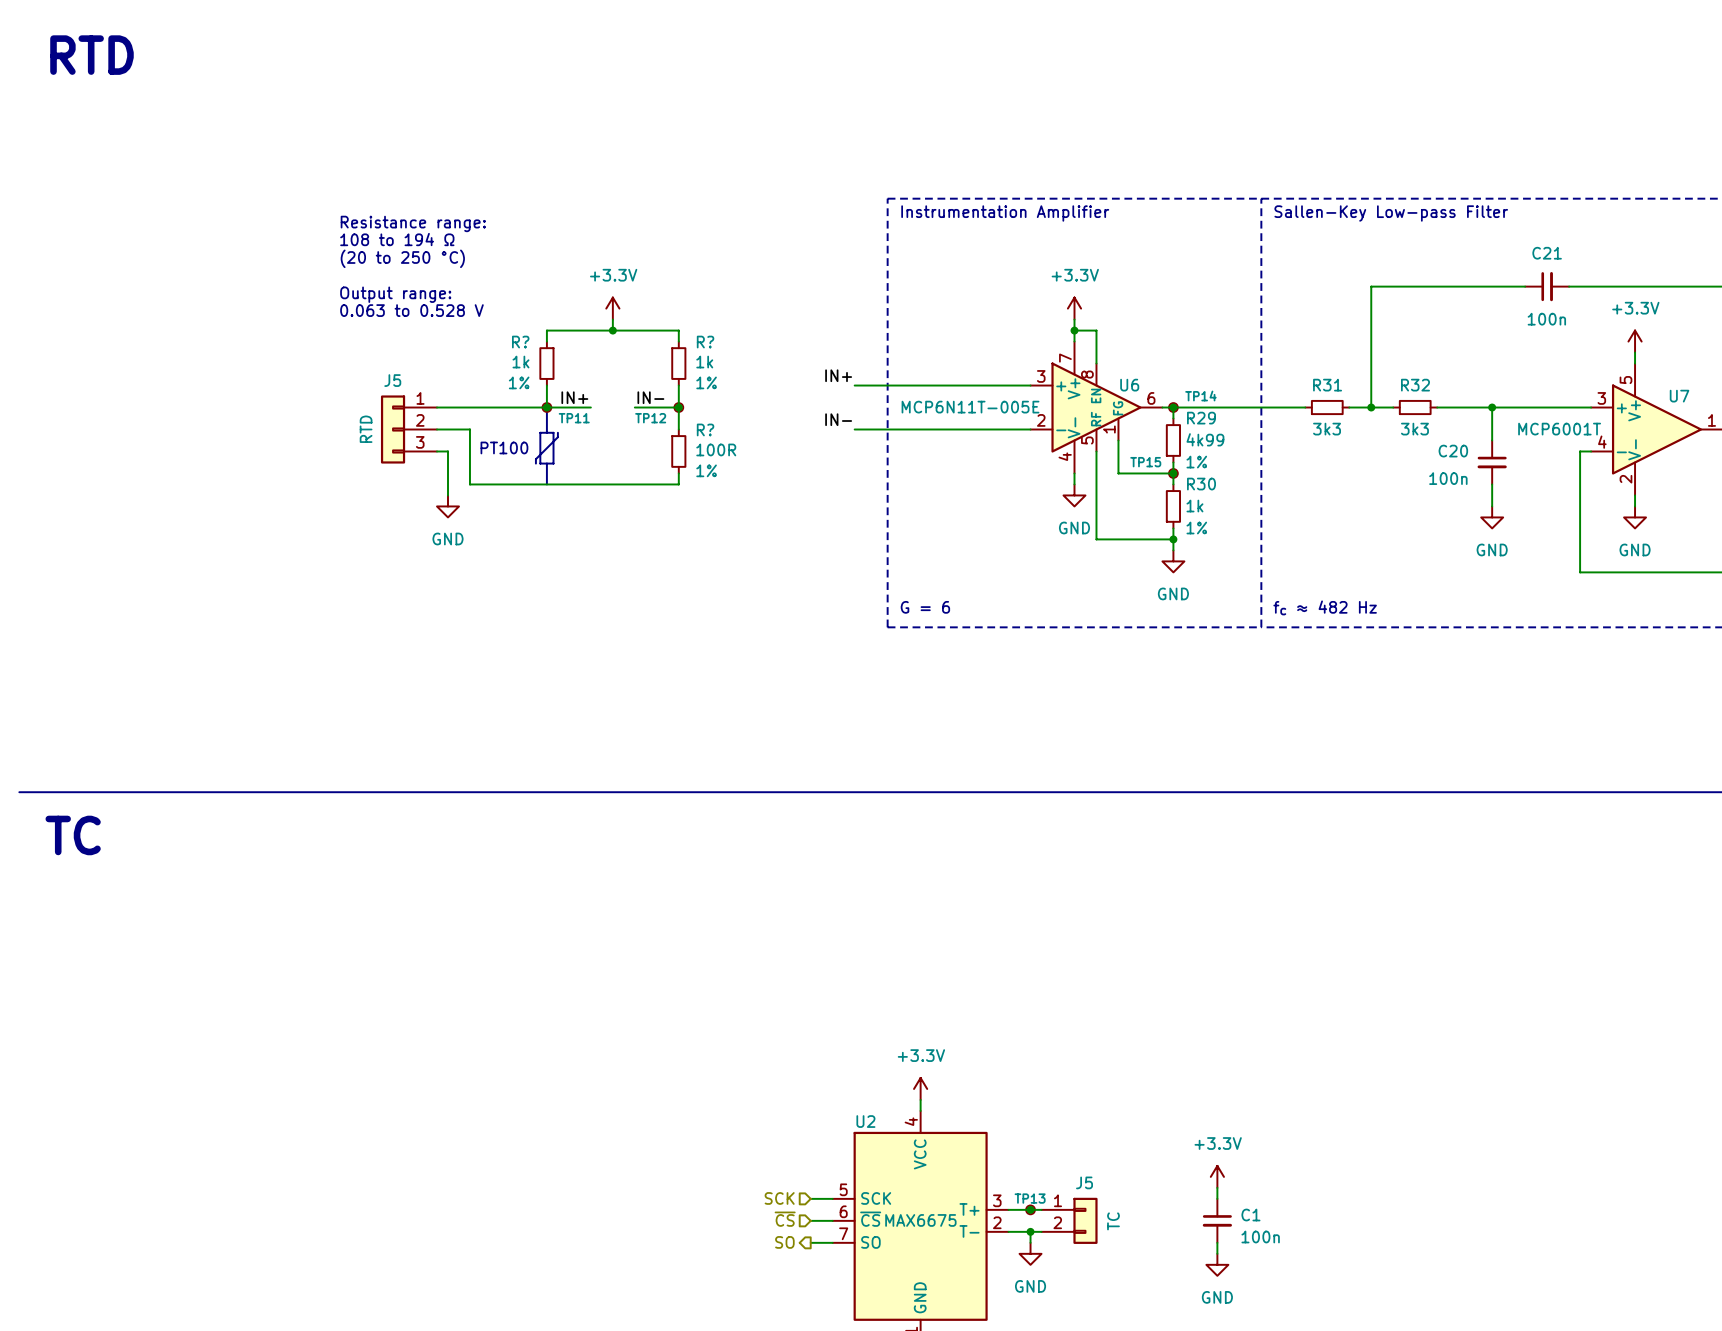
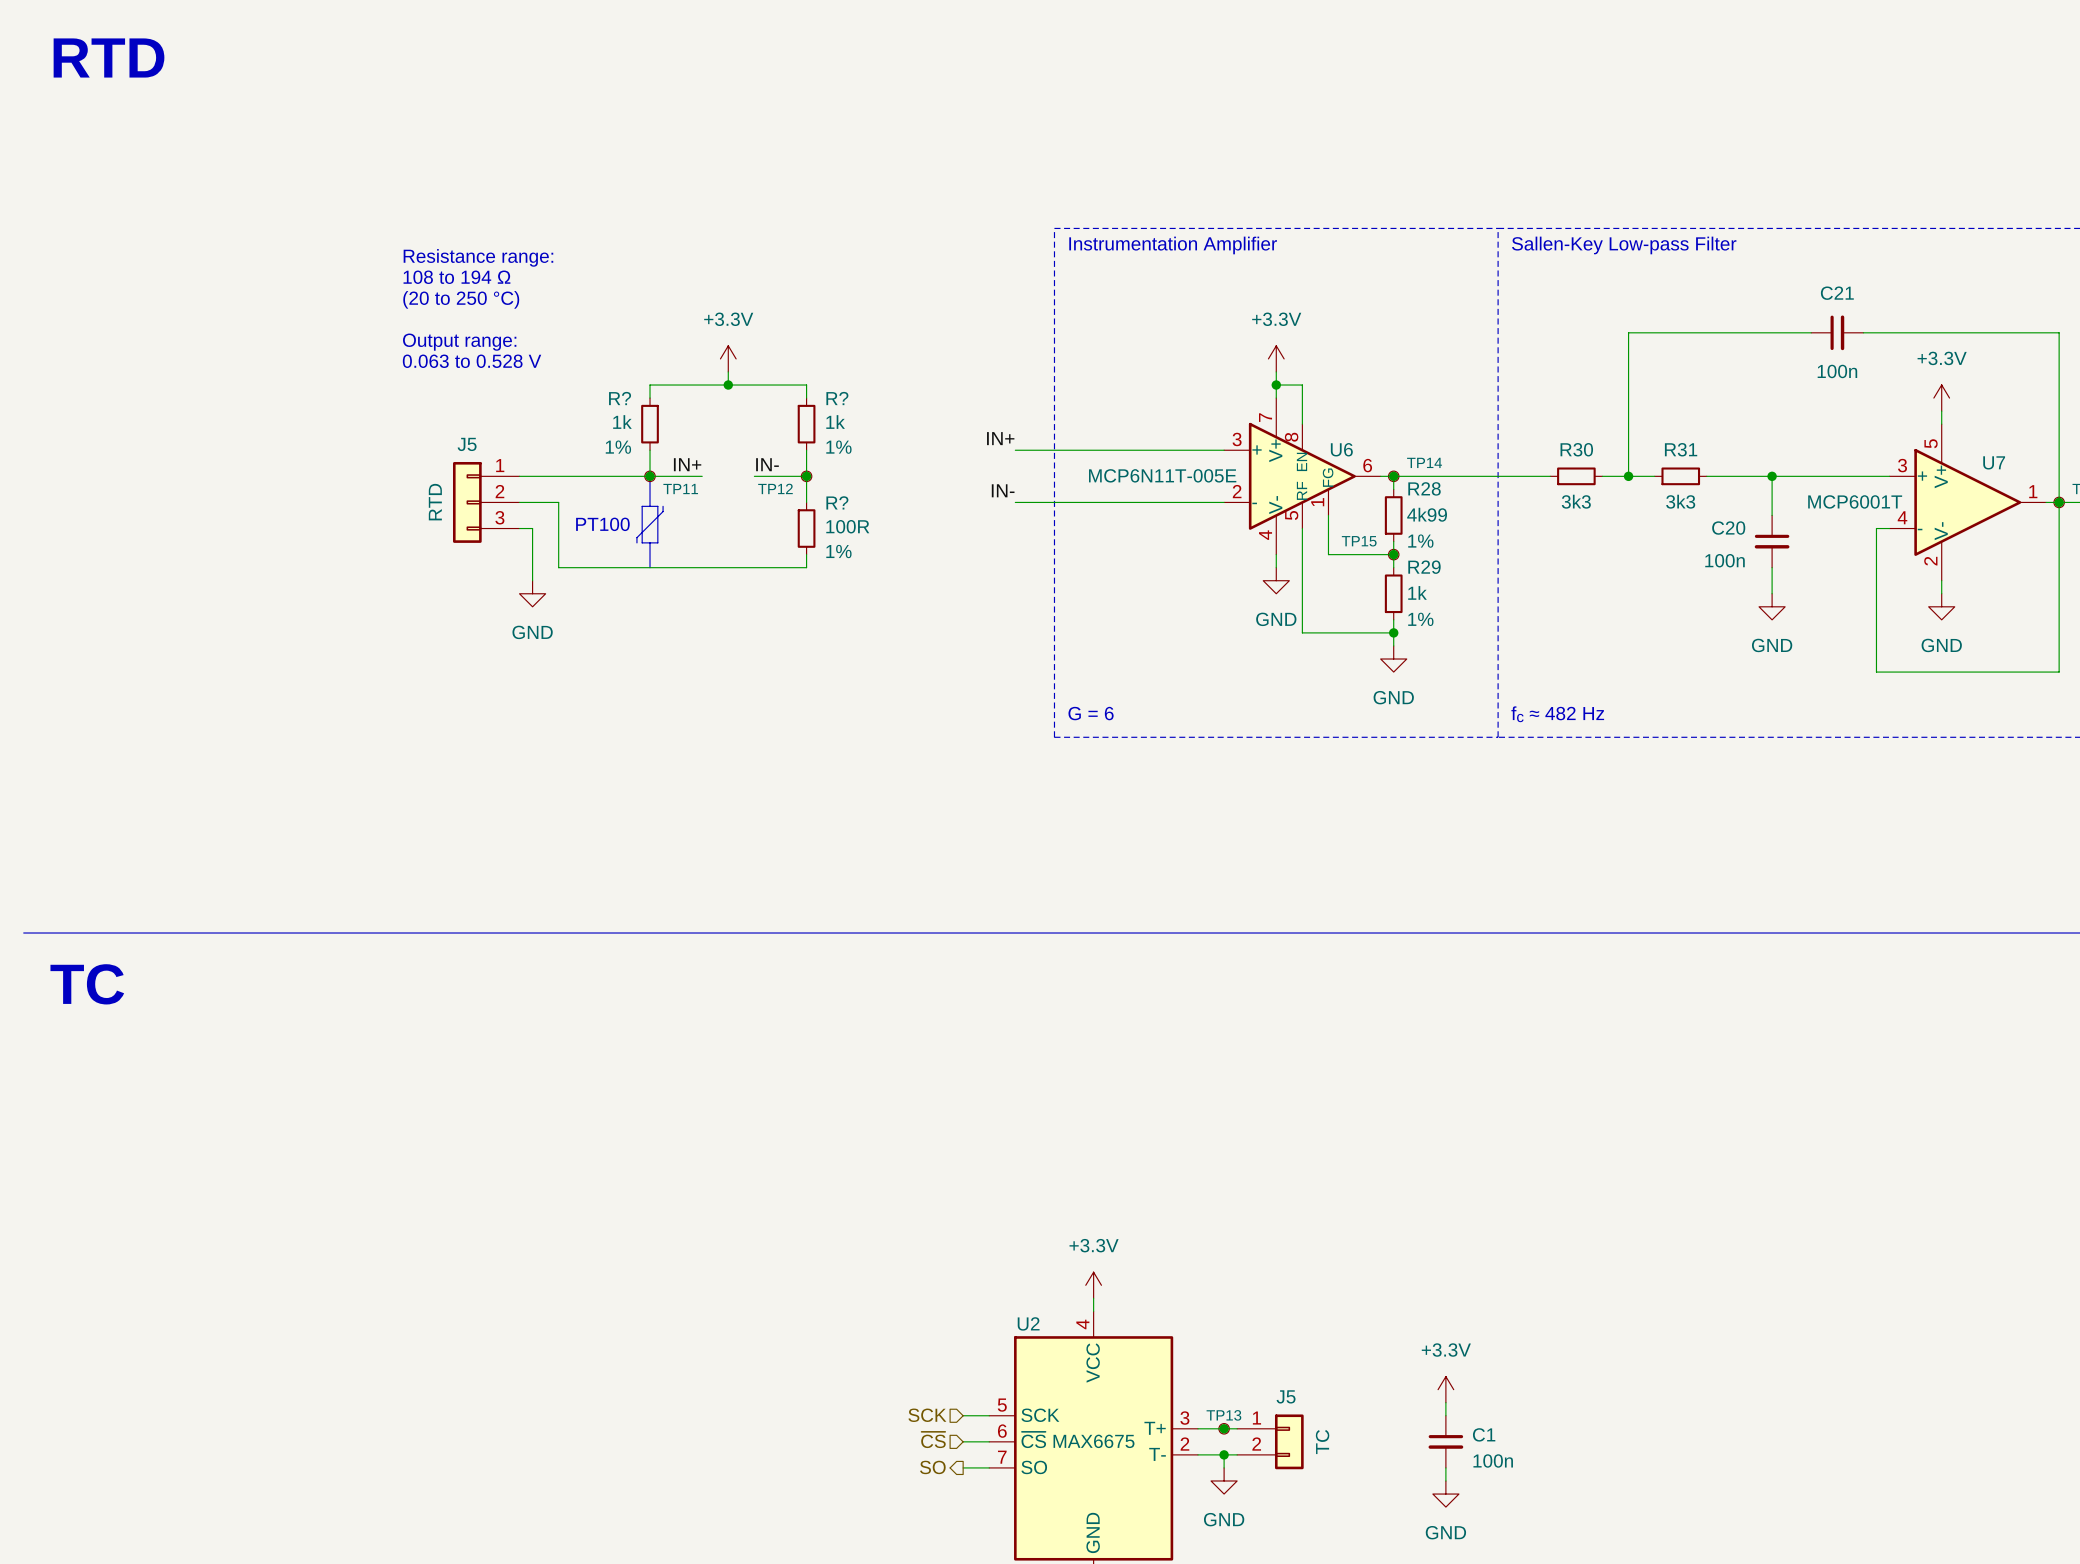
R31 name: R31 (1327, 385) -> R30 (1576, 449)
R32 name: R32 (1415, 385) -> R31 (1681, 449)
R29 name: R29 (1201, 418) -> R28 (1424, 488)
R30 name: R30 (1201, 484) -> R29 (1424, 567)

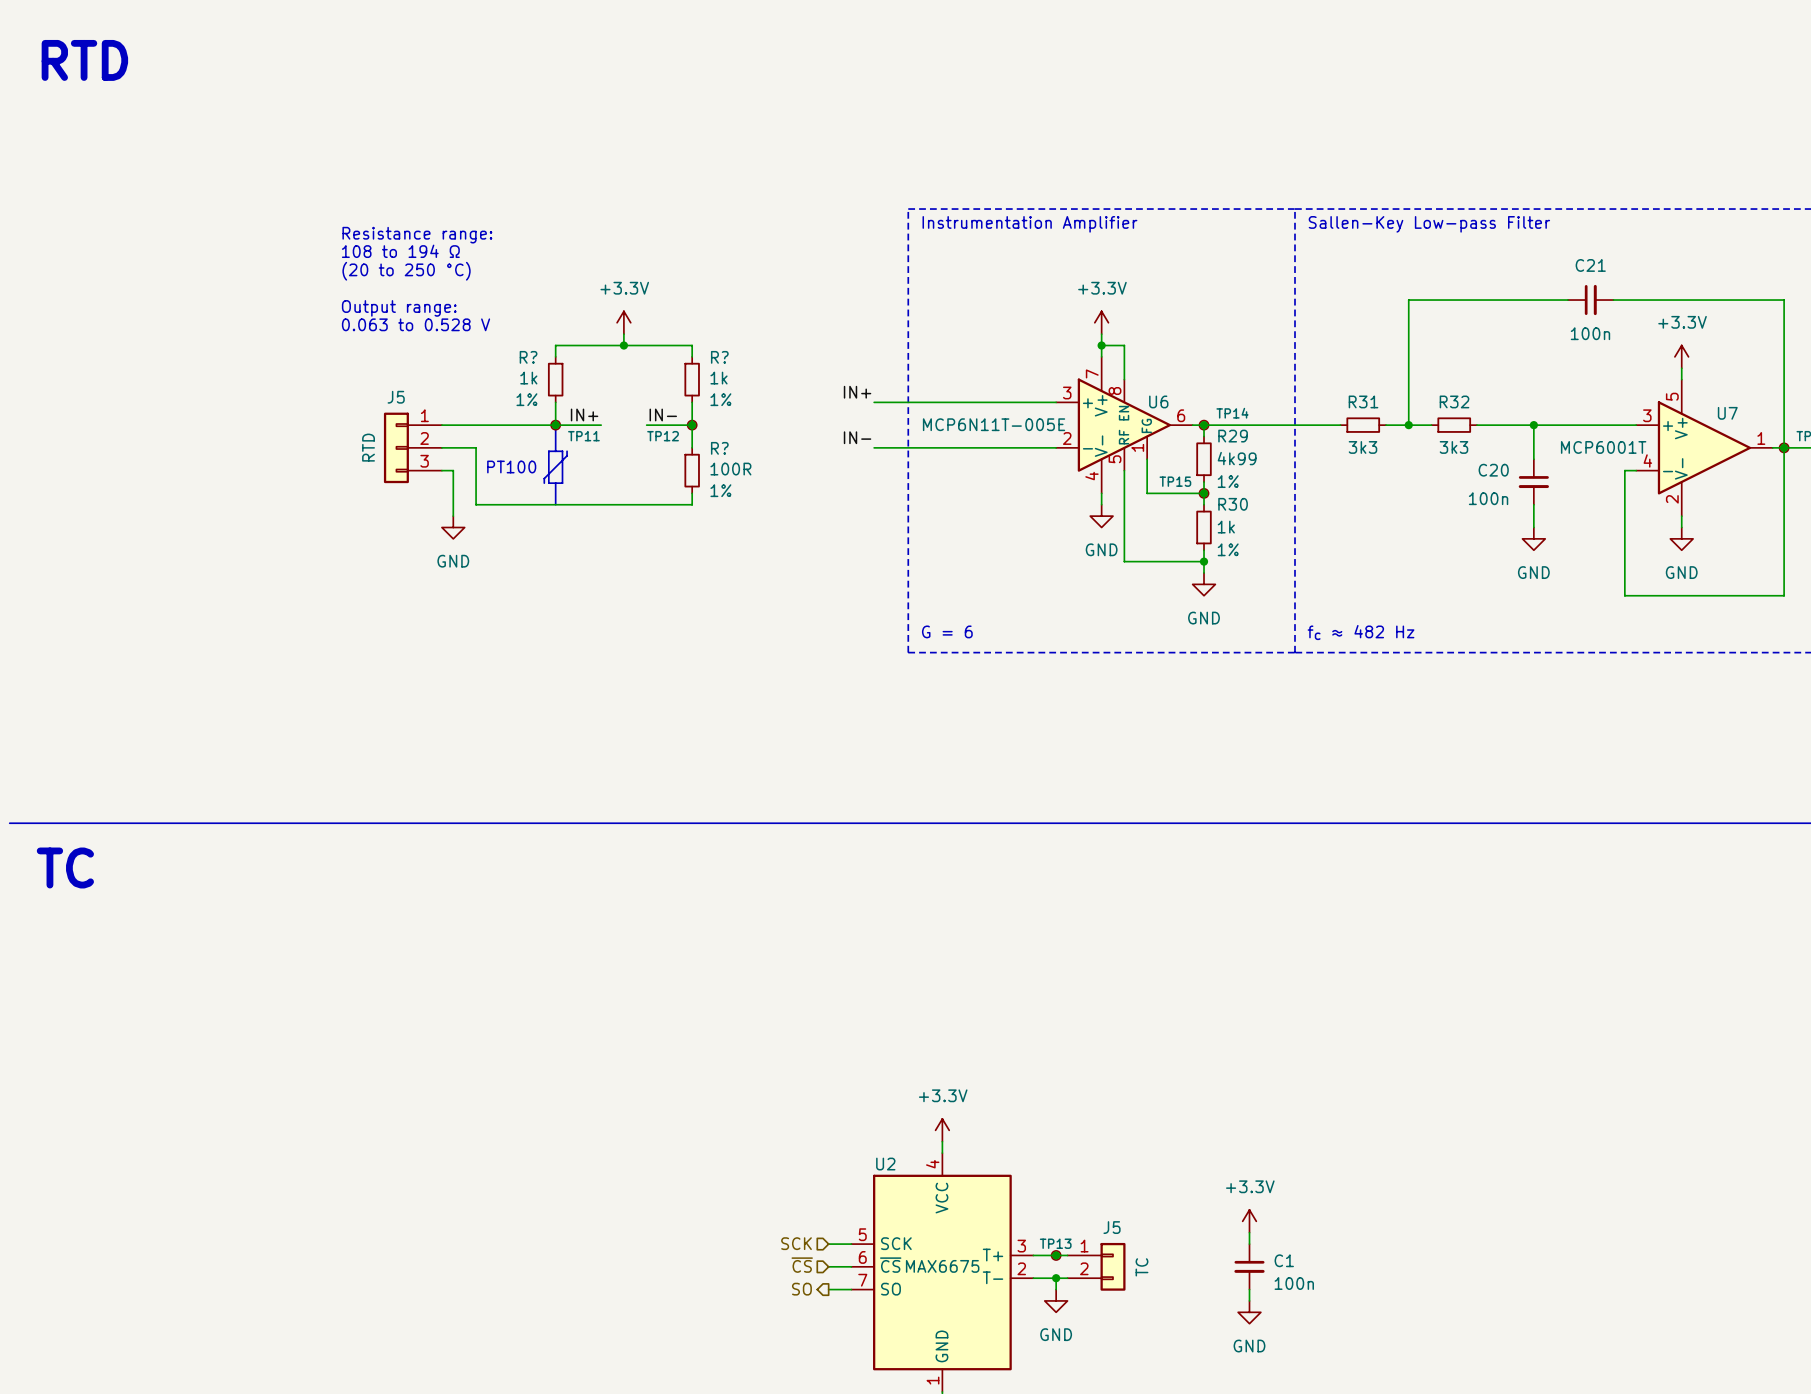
R30 name: R30 (1576, 449) -> R31 (1363, 401)
R31 name: R31 (1681, 449) -> R32 (1454, 401)
R28 name: R28 (1424, 488) -> R29 (1233, 436)
R29 name: R29 (1424, 567) -> R30 (1233, 504)

